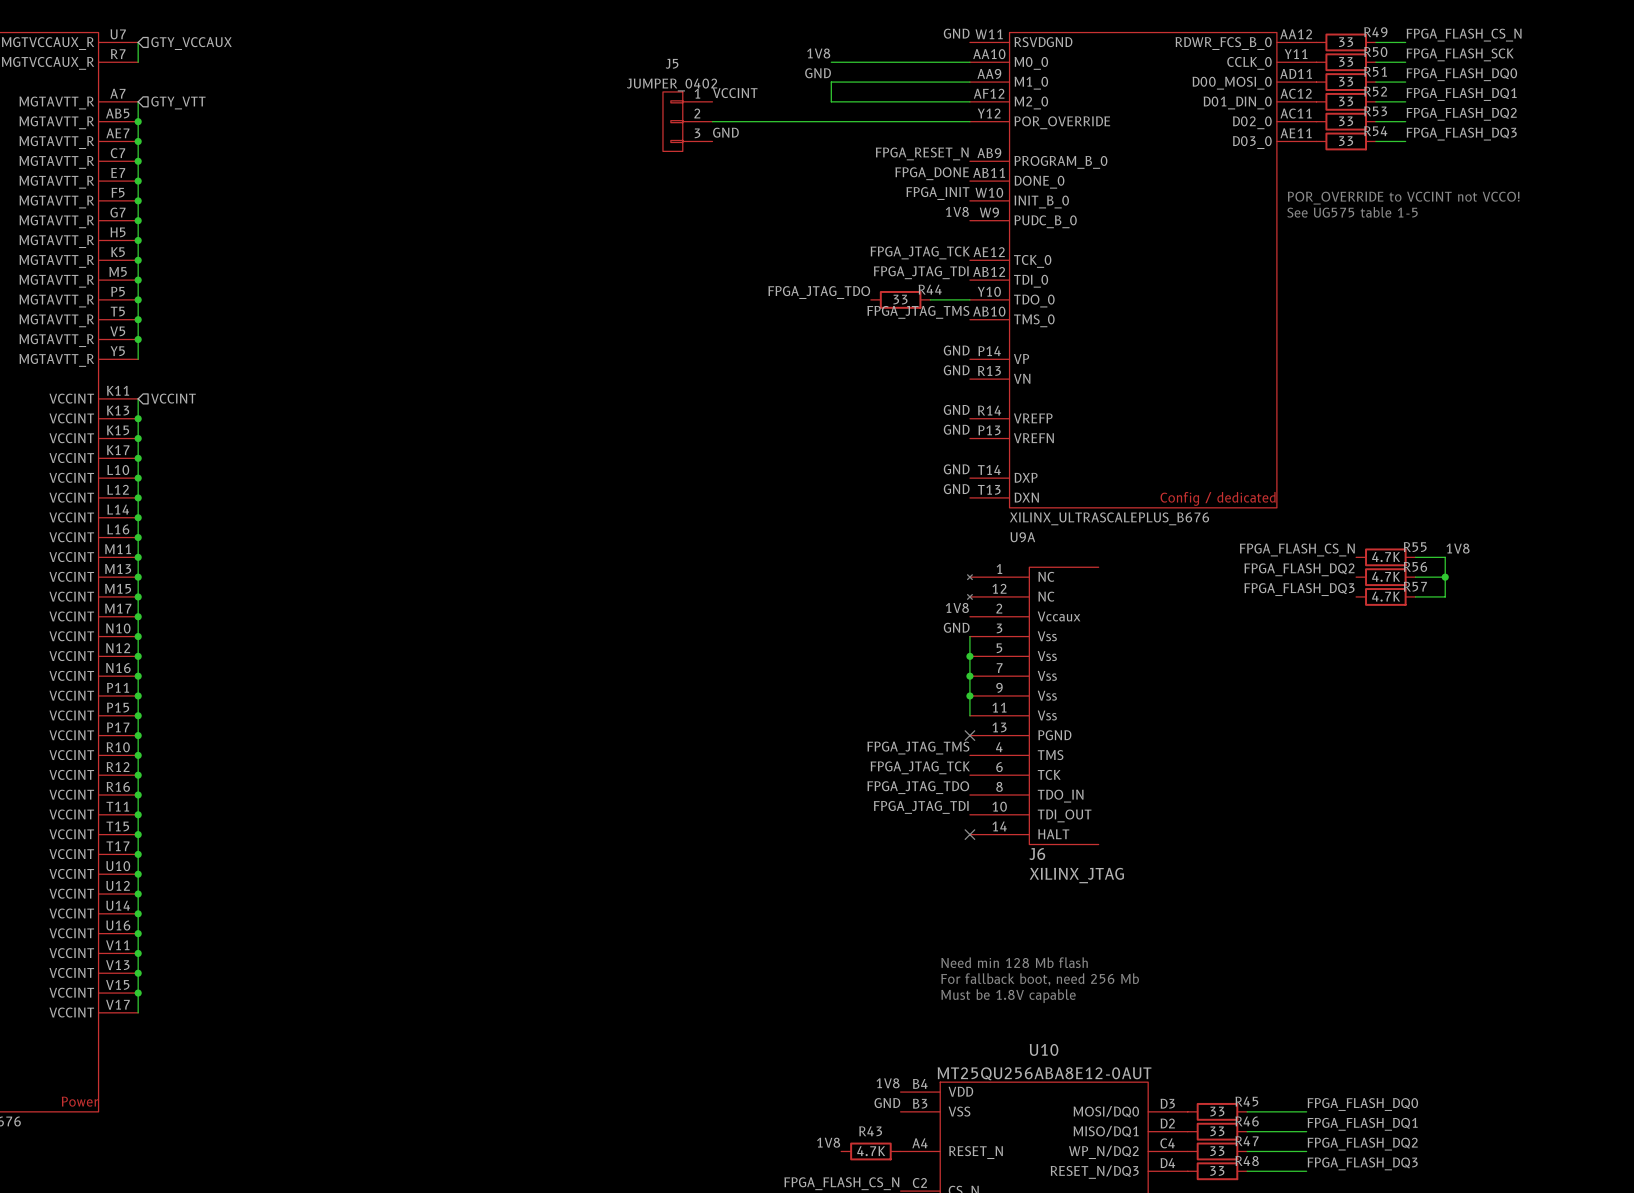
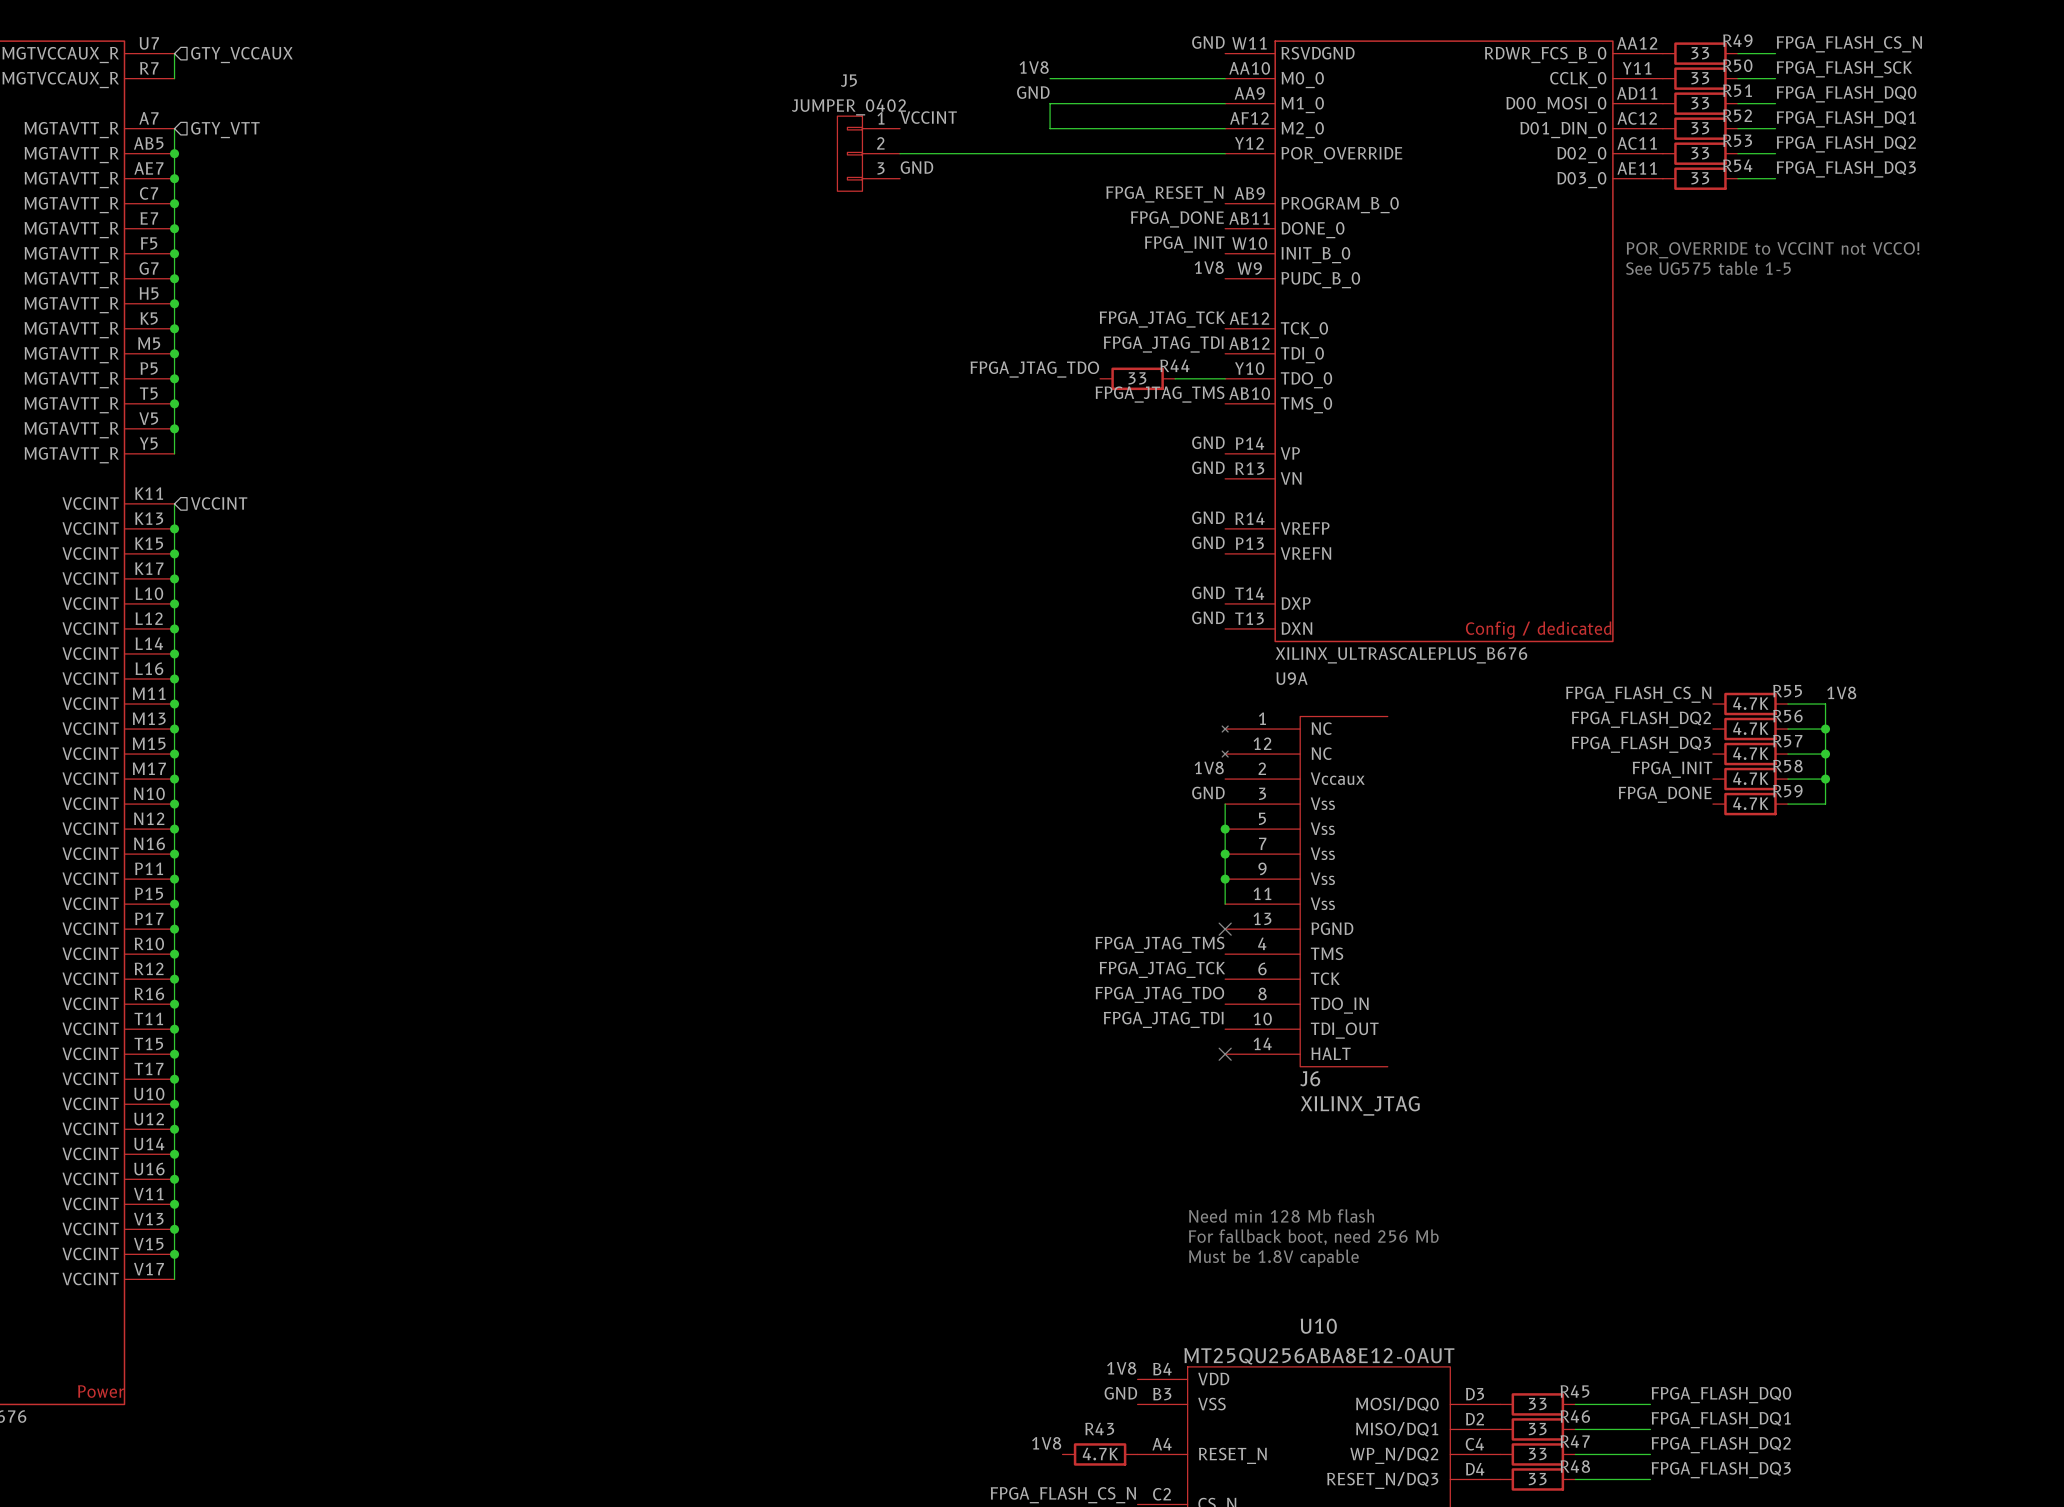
wire: none -> (1825, 754) (1825, 804) (1788, 804)
junction: none -> (1825, 754)
label: none -> FPGA_INIT (1672, 769)
R58: none -> 4.7K (1750, 779)
wire: none -> (1788, 779) (1825, 779)
junction: none -> (1825, 779)
label: none -> FPGA_DONE (1665, 794)
R59: none -> 4.7K (1750, 804)

